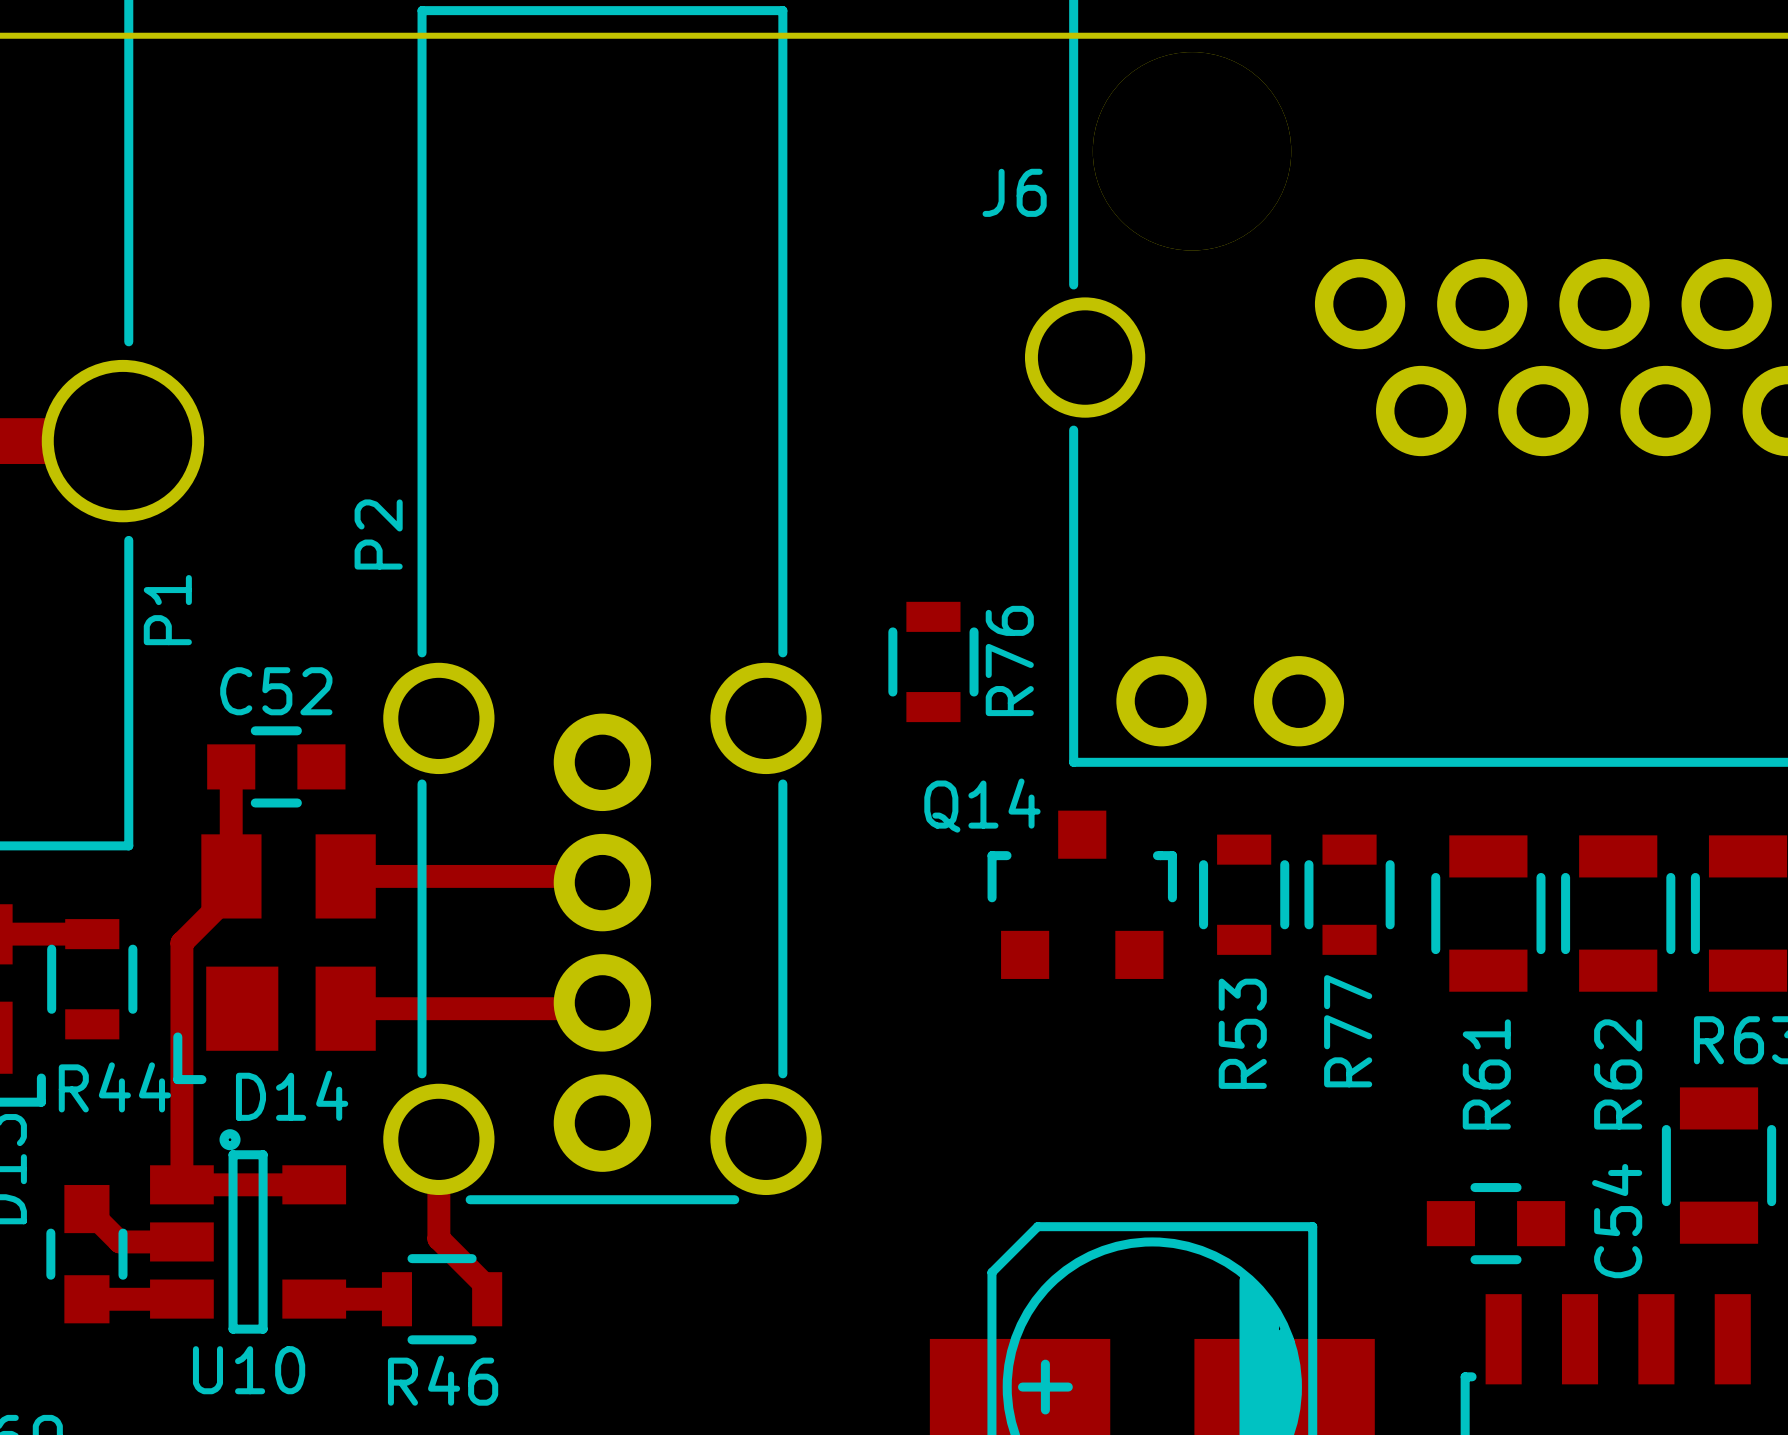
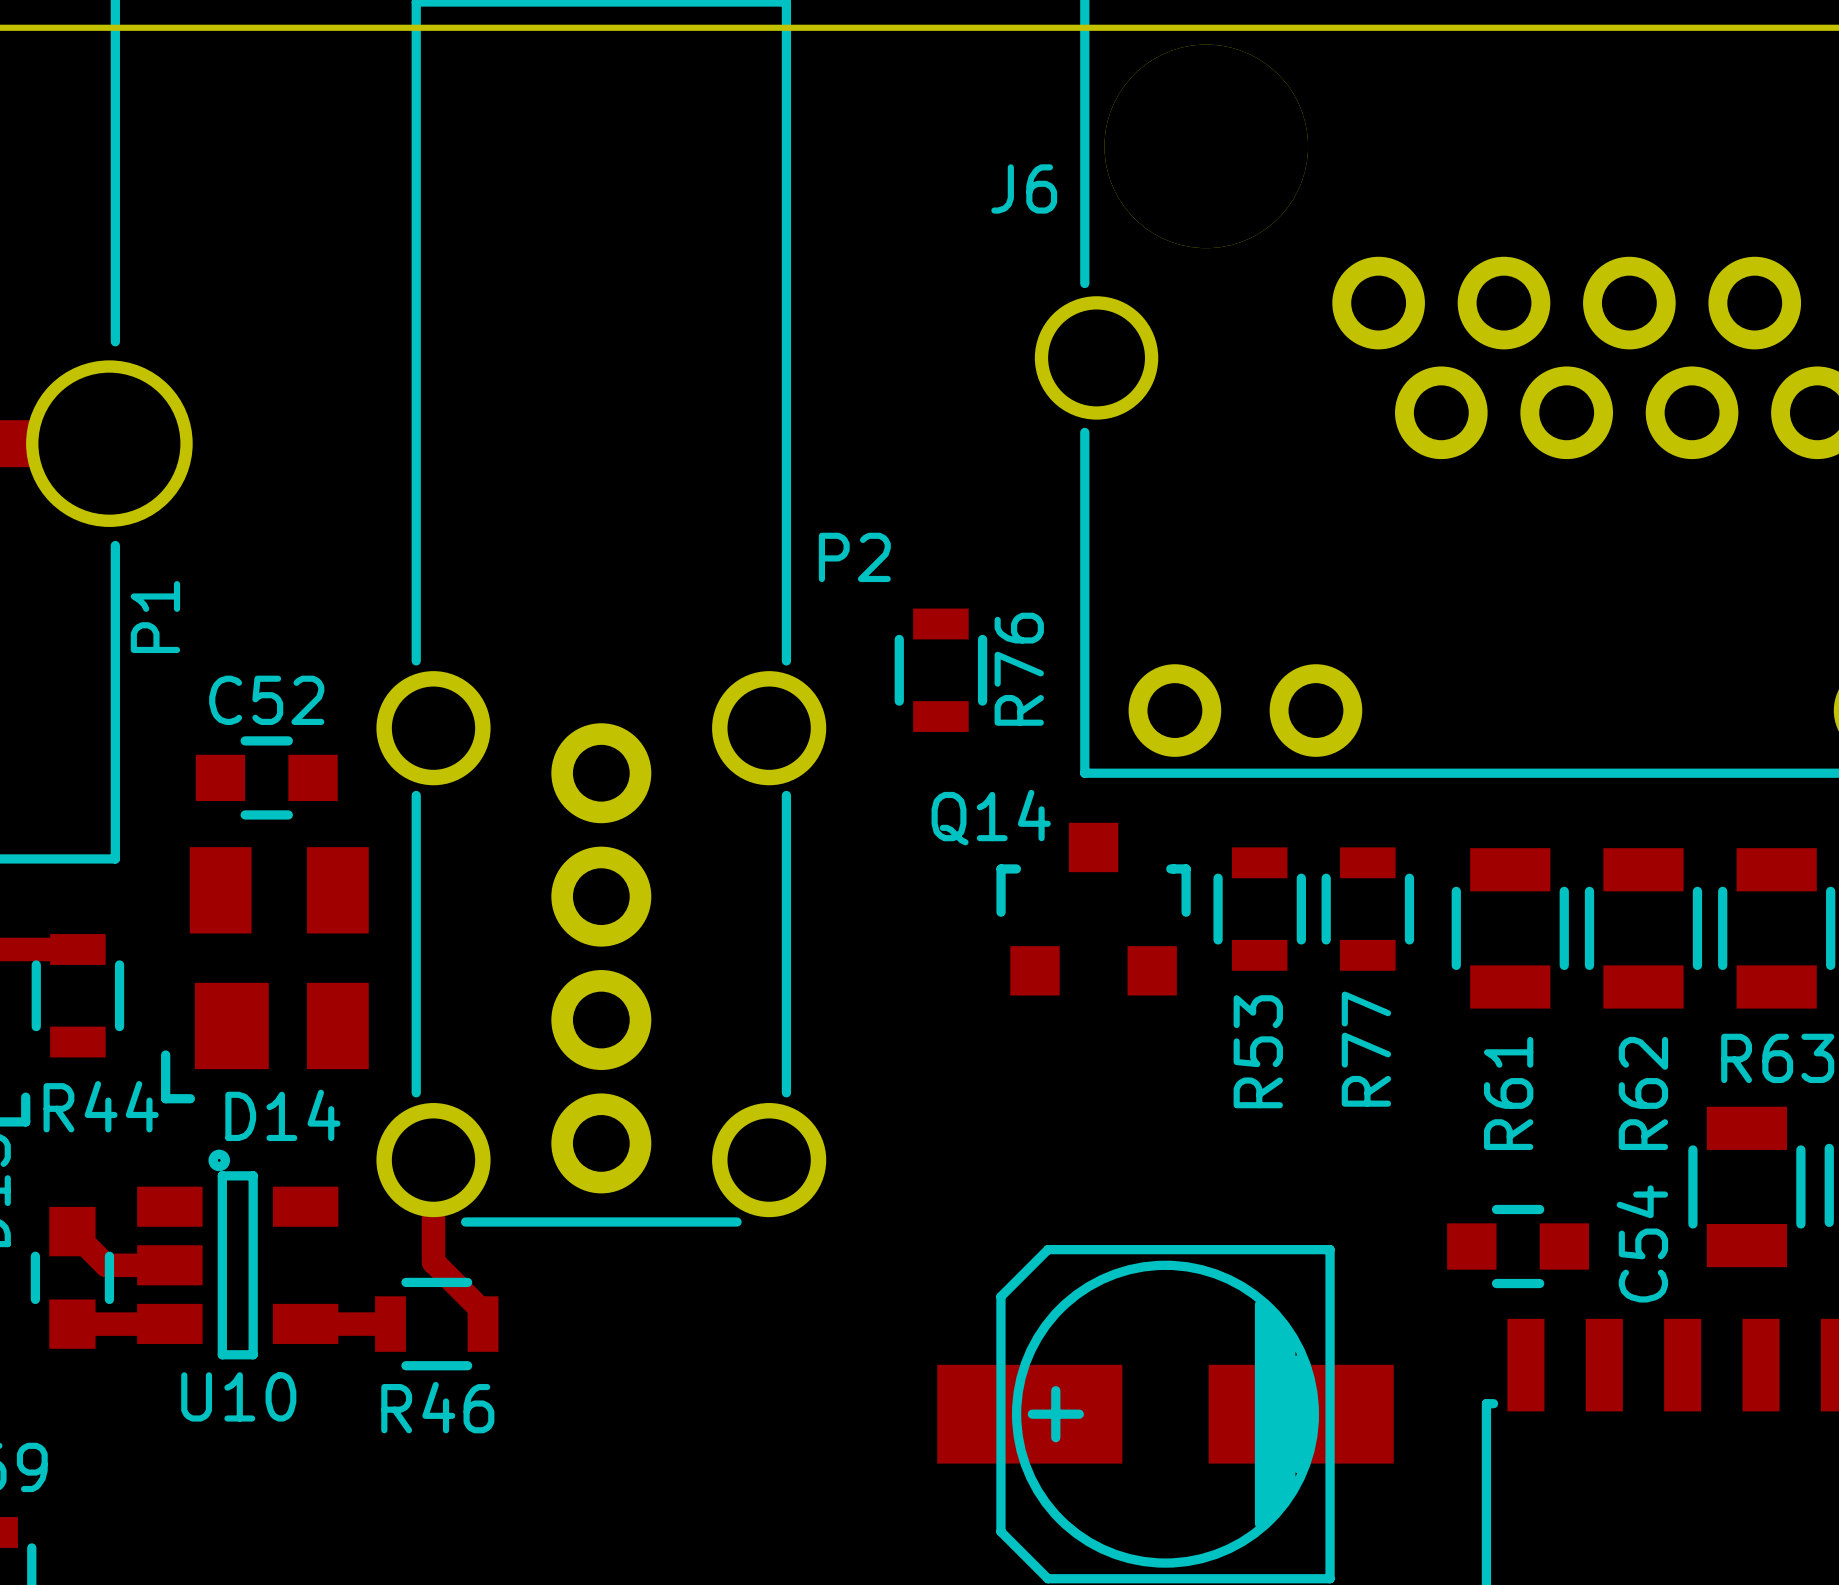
P2 name rotation: 0° (378, 534) -> 90° clockwise (854, 557)
P2 name position: P2 (378, 534) -> P2 (854, 557)
top track: (231, 766) (231, 893) (181, 943) (181, 1184) (314, 1184) -> none
top track: (345, 876) (596, 876) (602, 882) -> none
top track: (602, 1002) (596, 1008) (345, 1008) -> none

